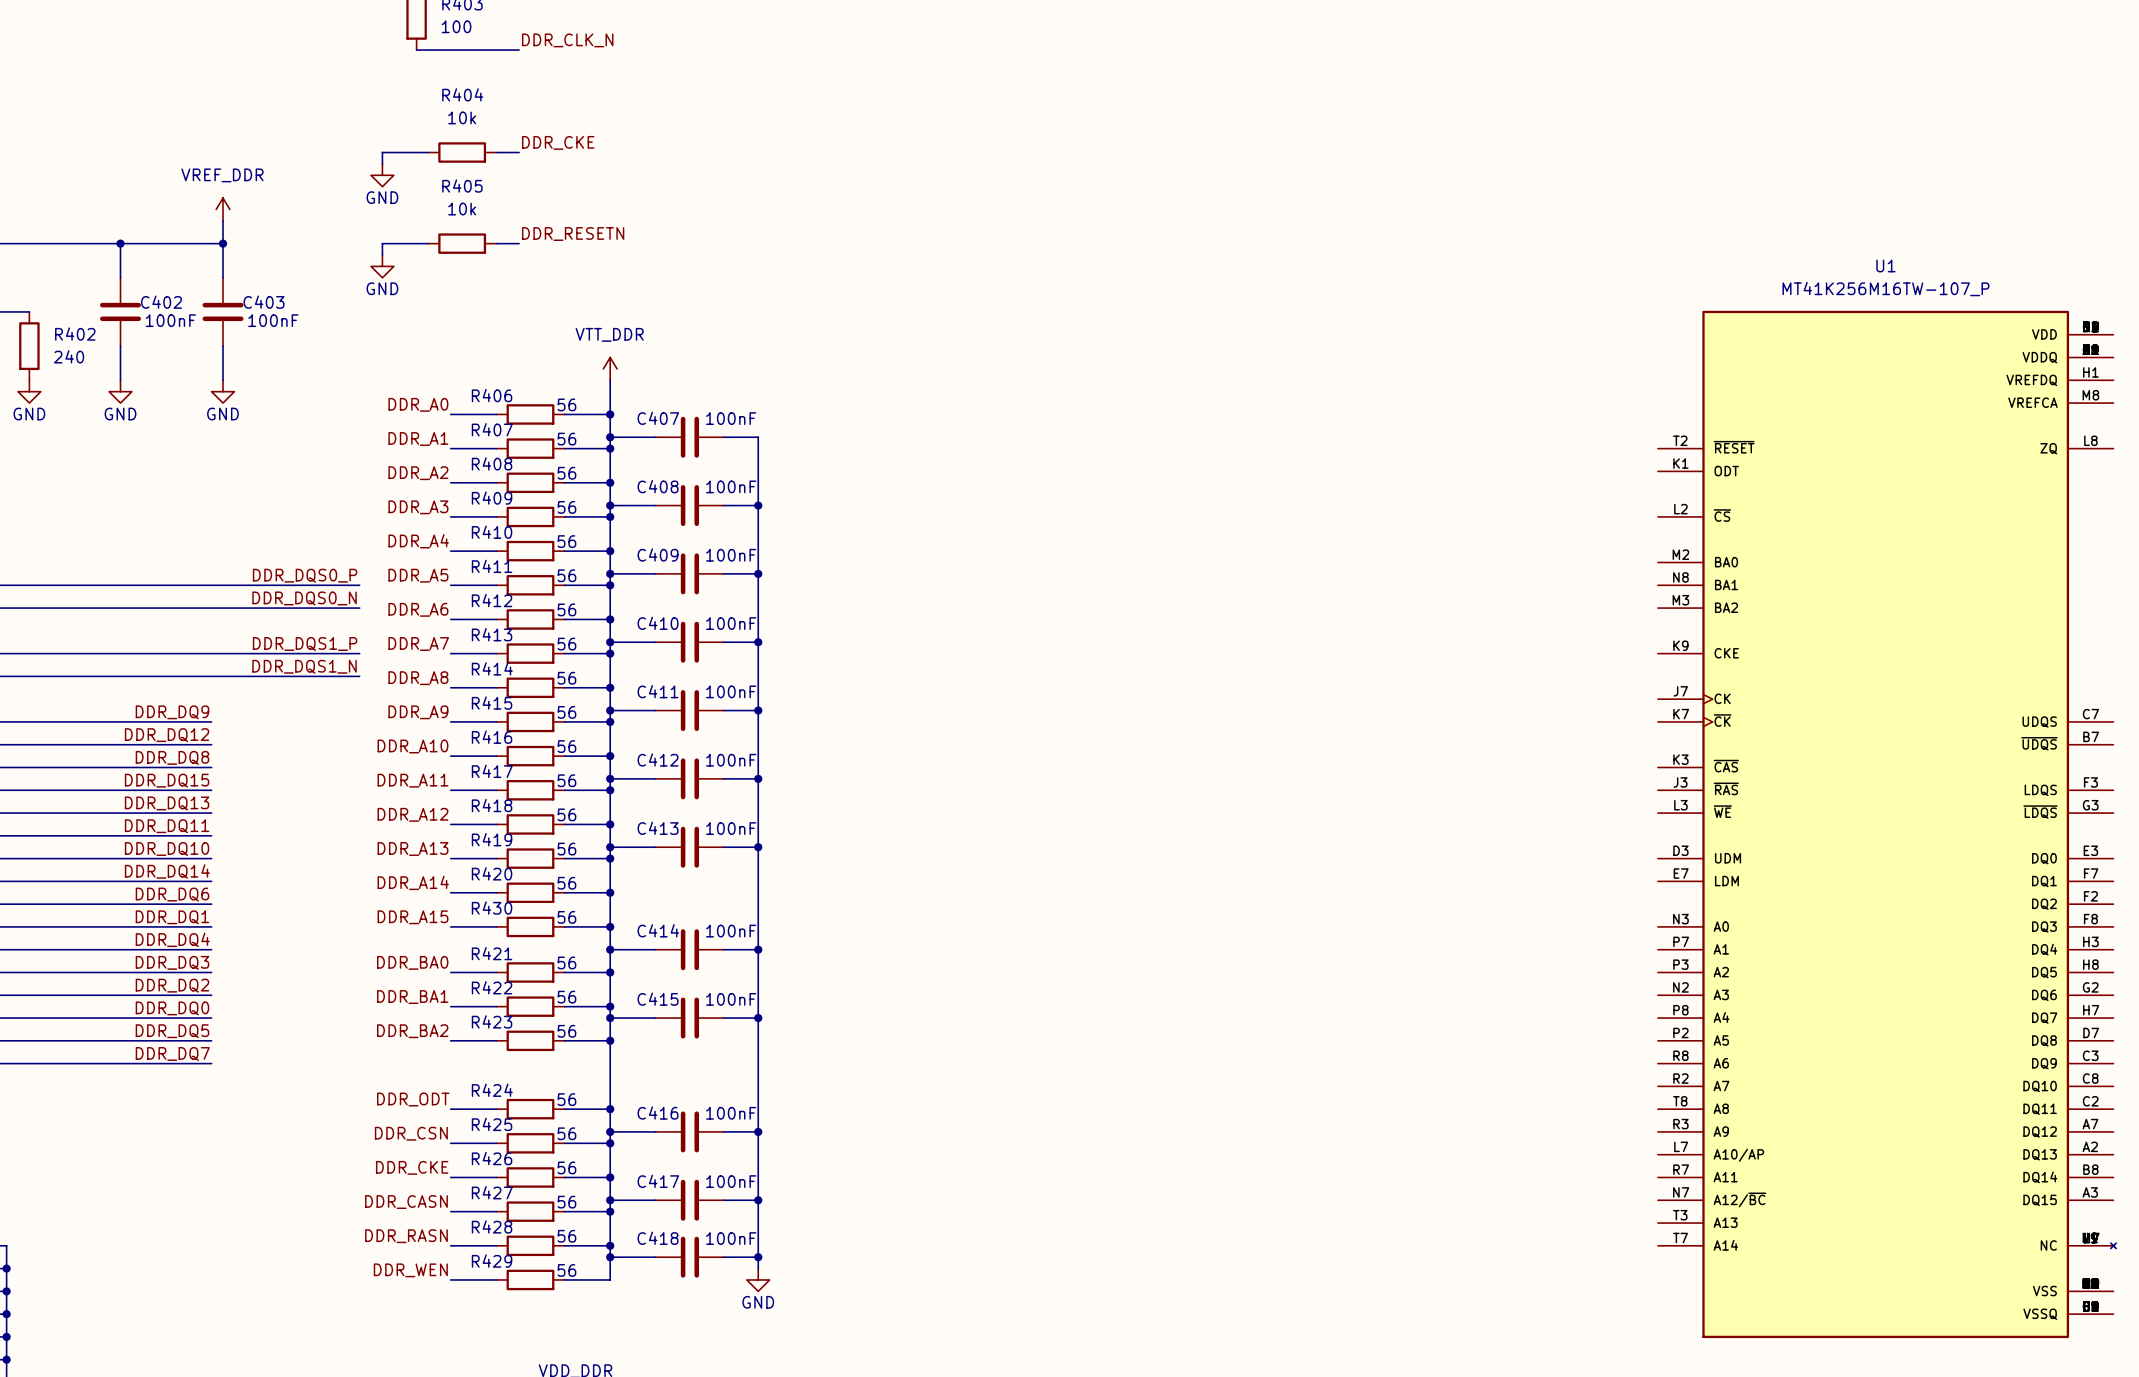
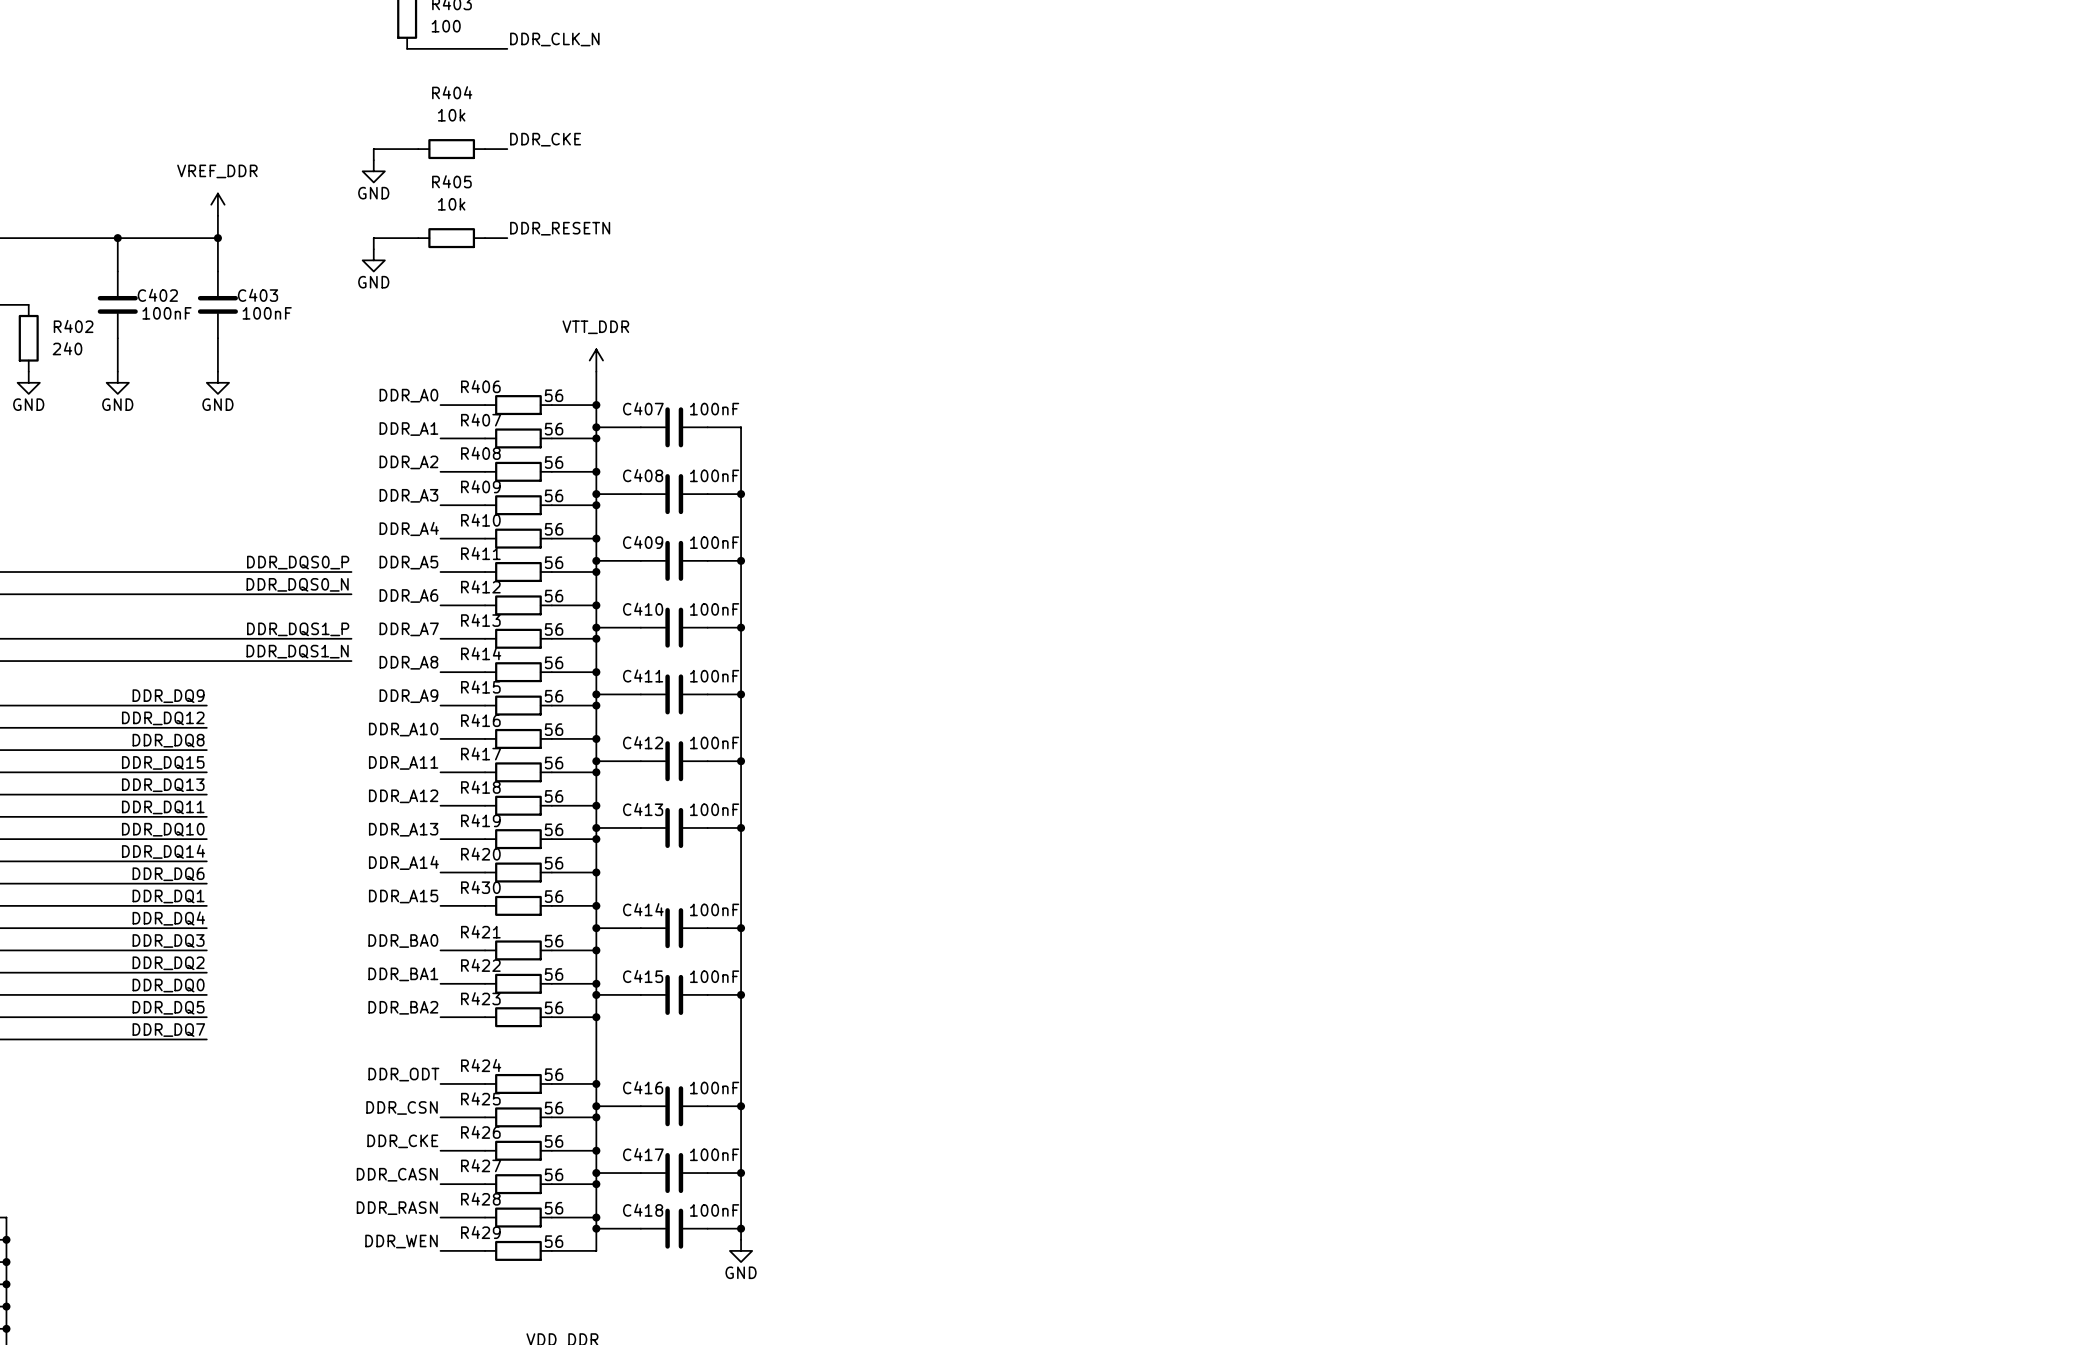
U1: MT41K256M16TW-107_P (1887, 824) -> none

